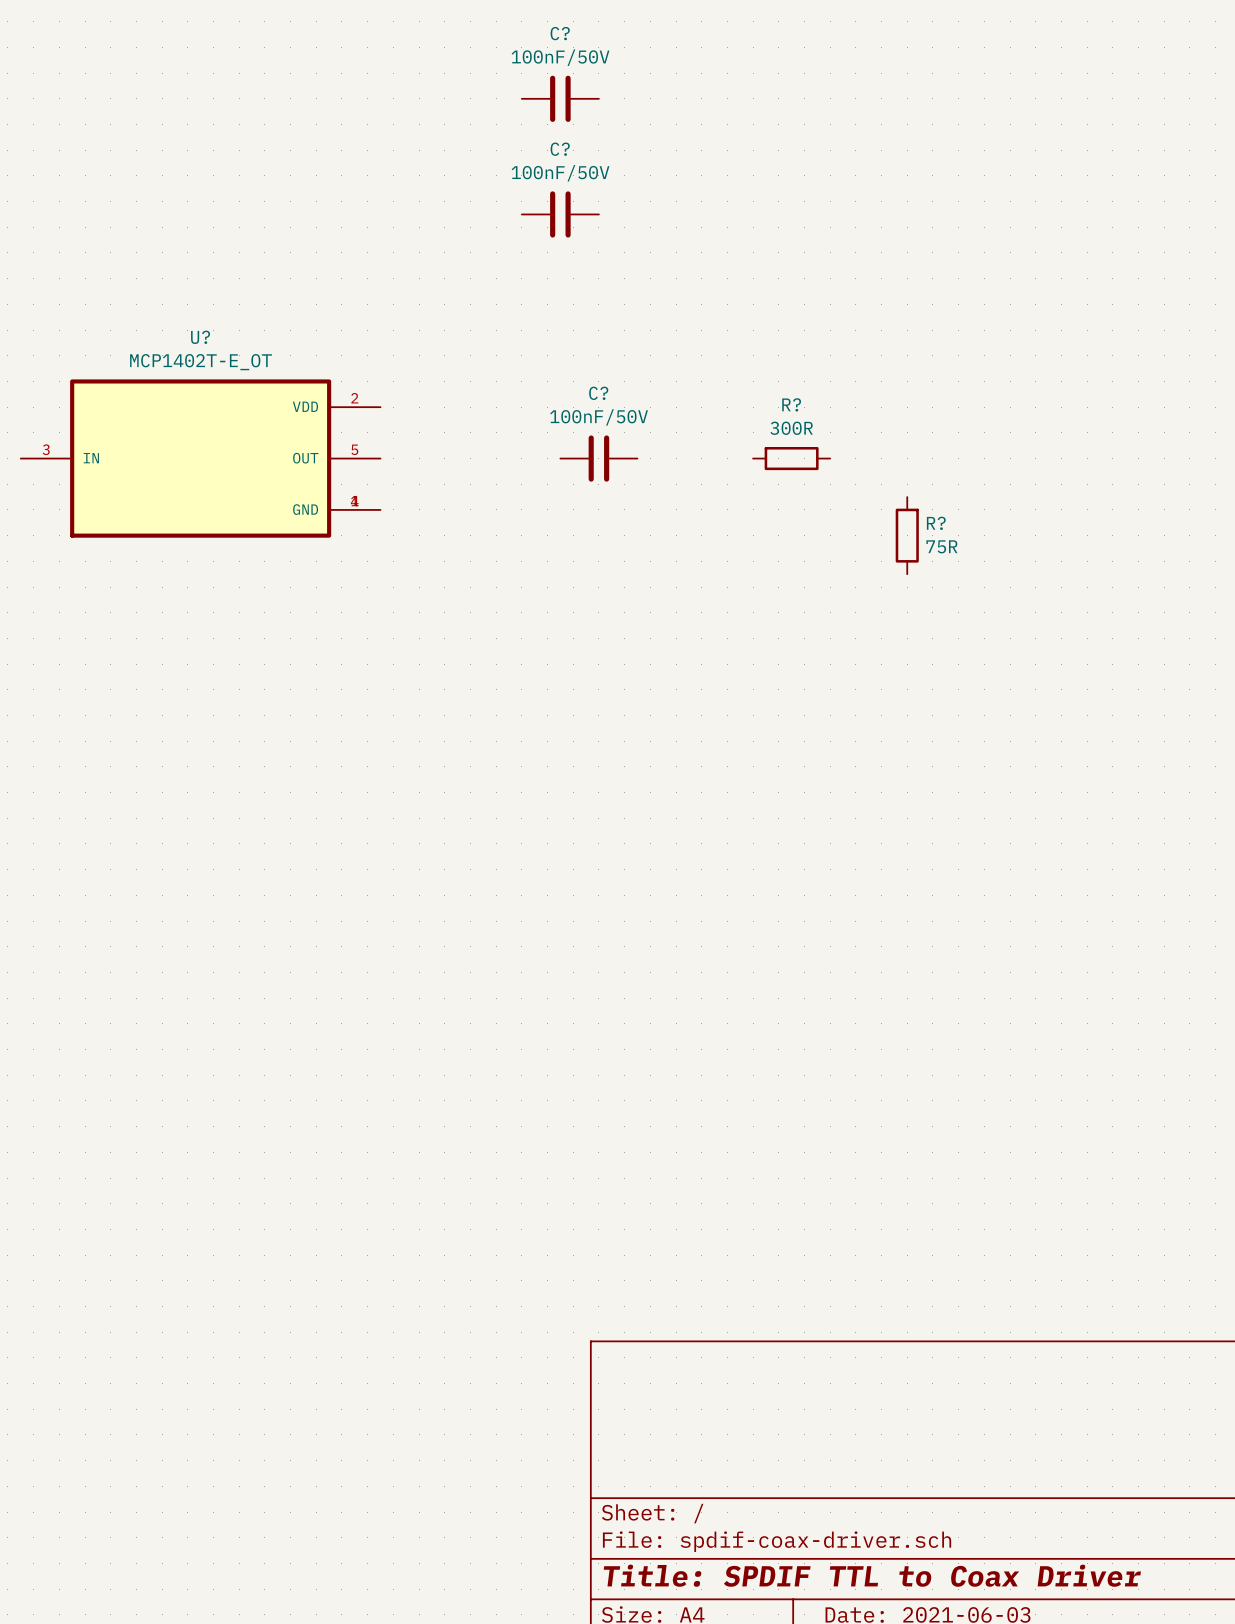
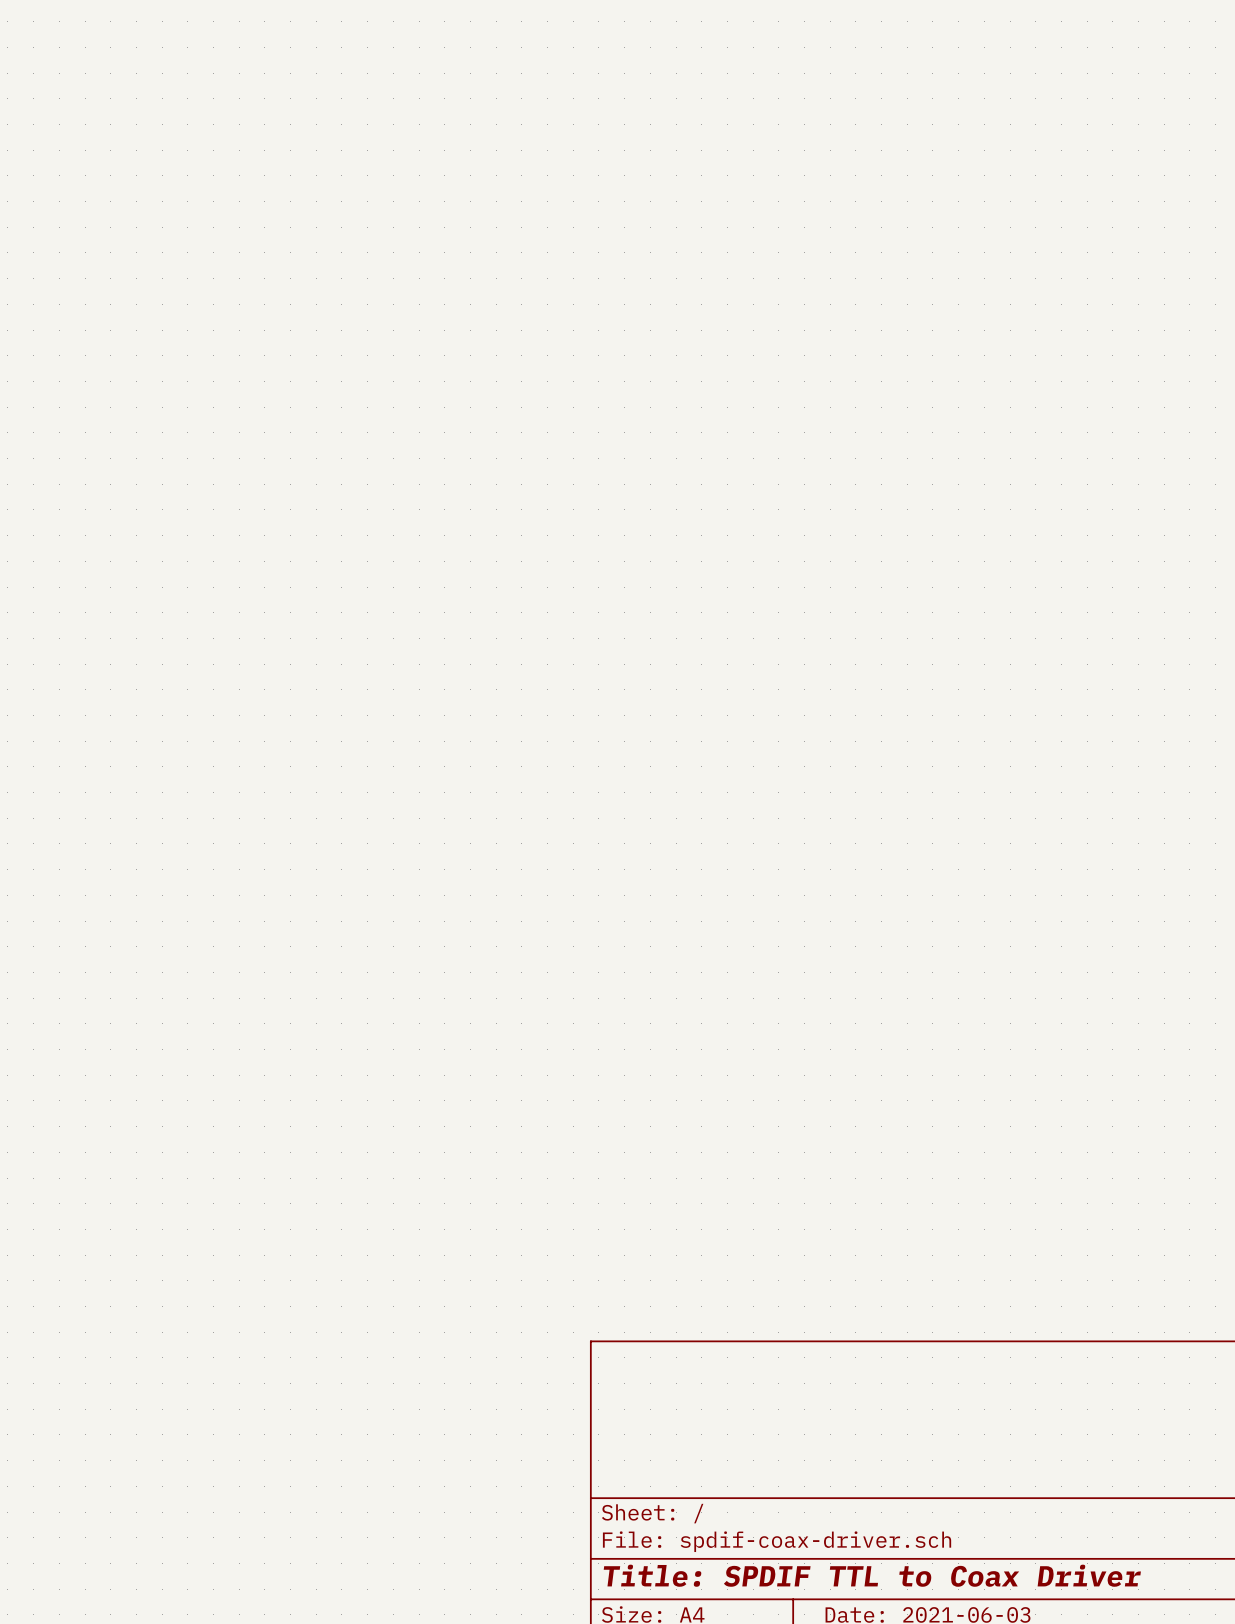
C?: 100nF/50V (560, 98) -> none
C?: 100nF/50V (560, 214) -> none
U?: MCP1402T-E_OT (200, 458) -> none
C?: 100nF/50V (598, 458) -> none
R?: 300R (791, 458) -> none
R?: 75R (907, 535) -> none

